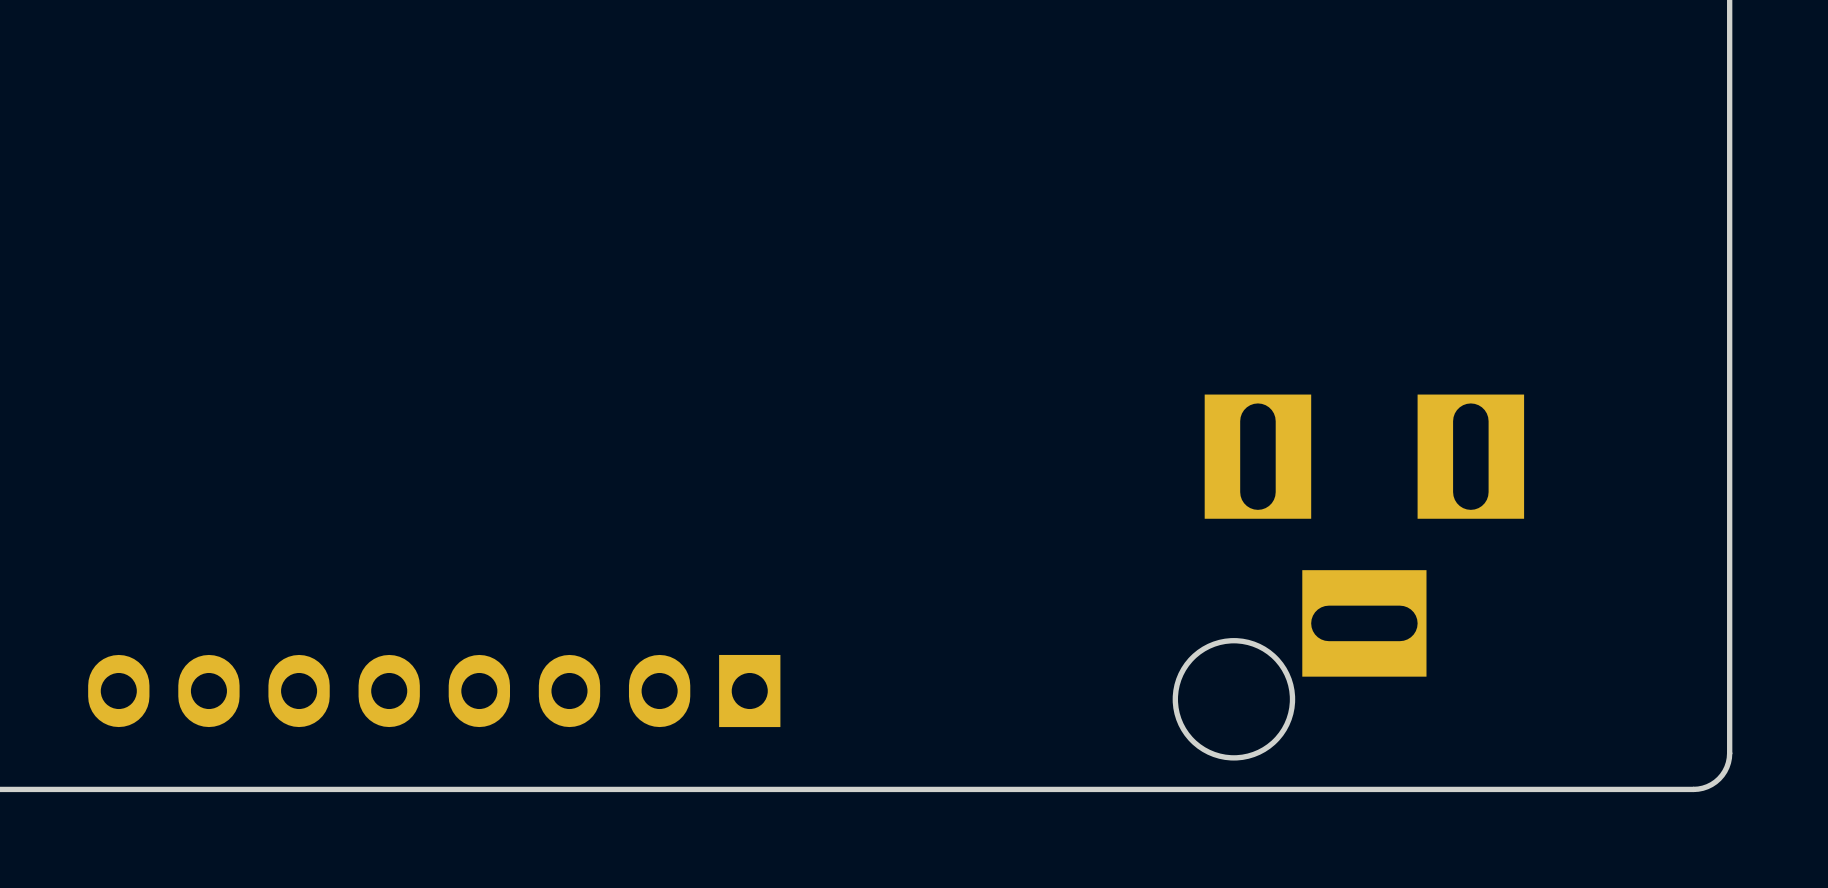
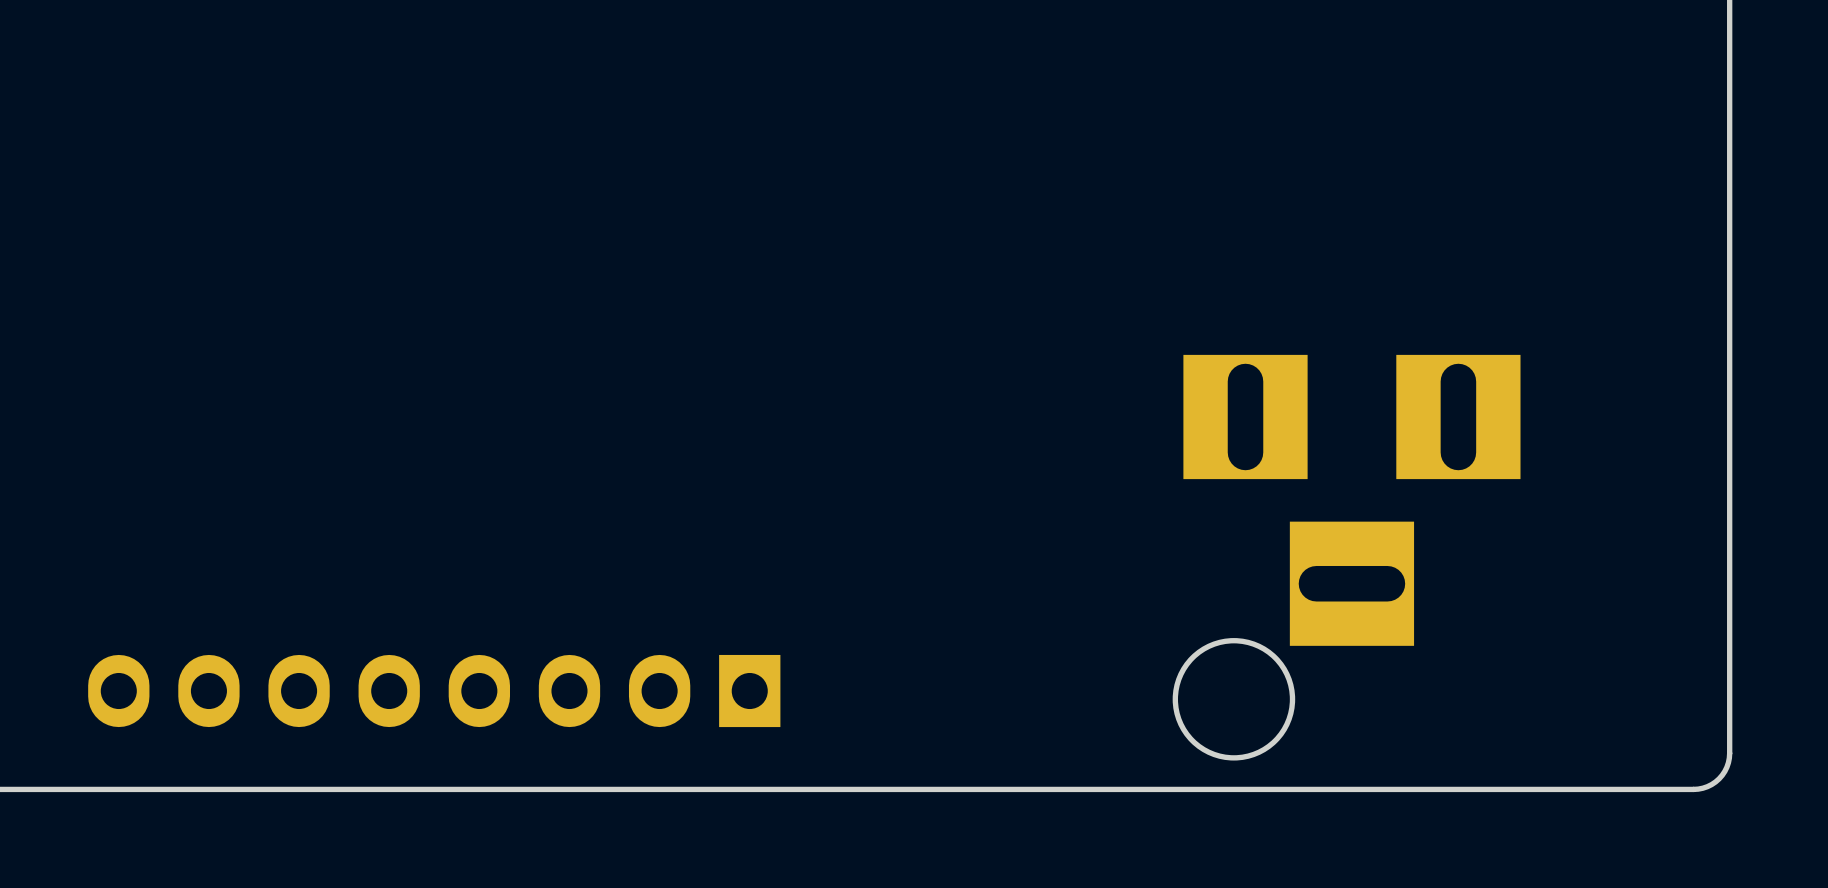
part: none -> (1351, 500)
part: (1364, 535) -> none

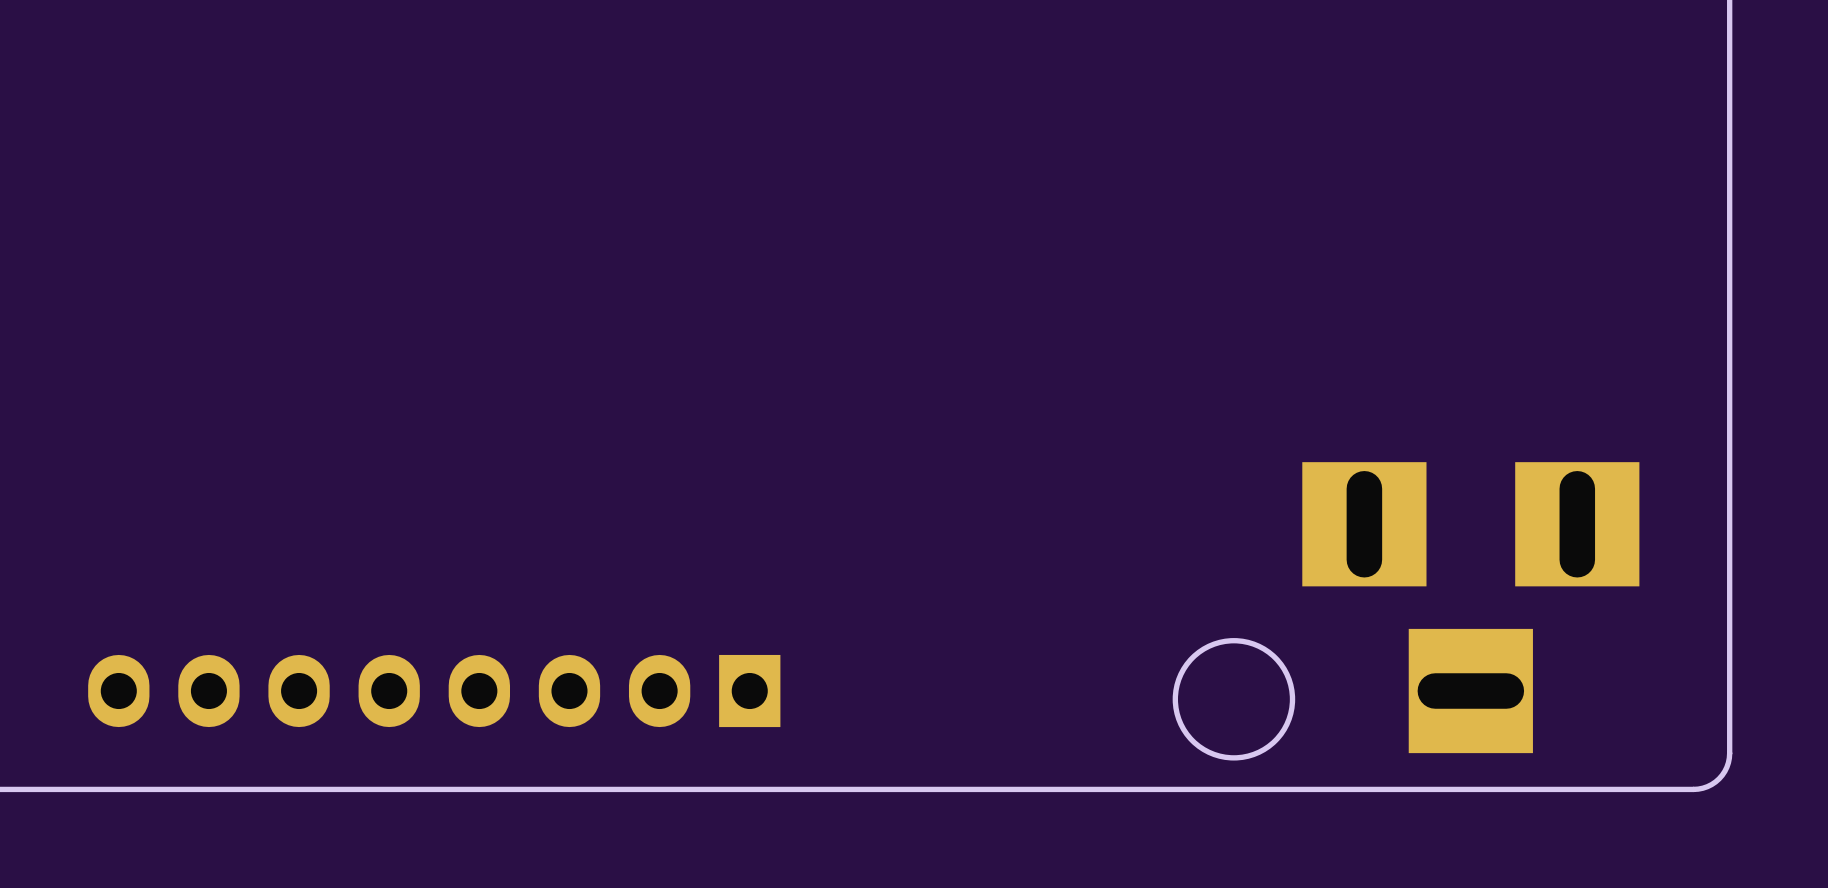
part position: (1351, 500) -> (1470, 607)

